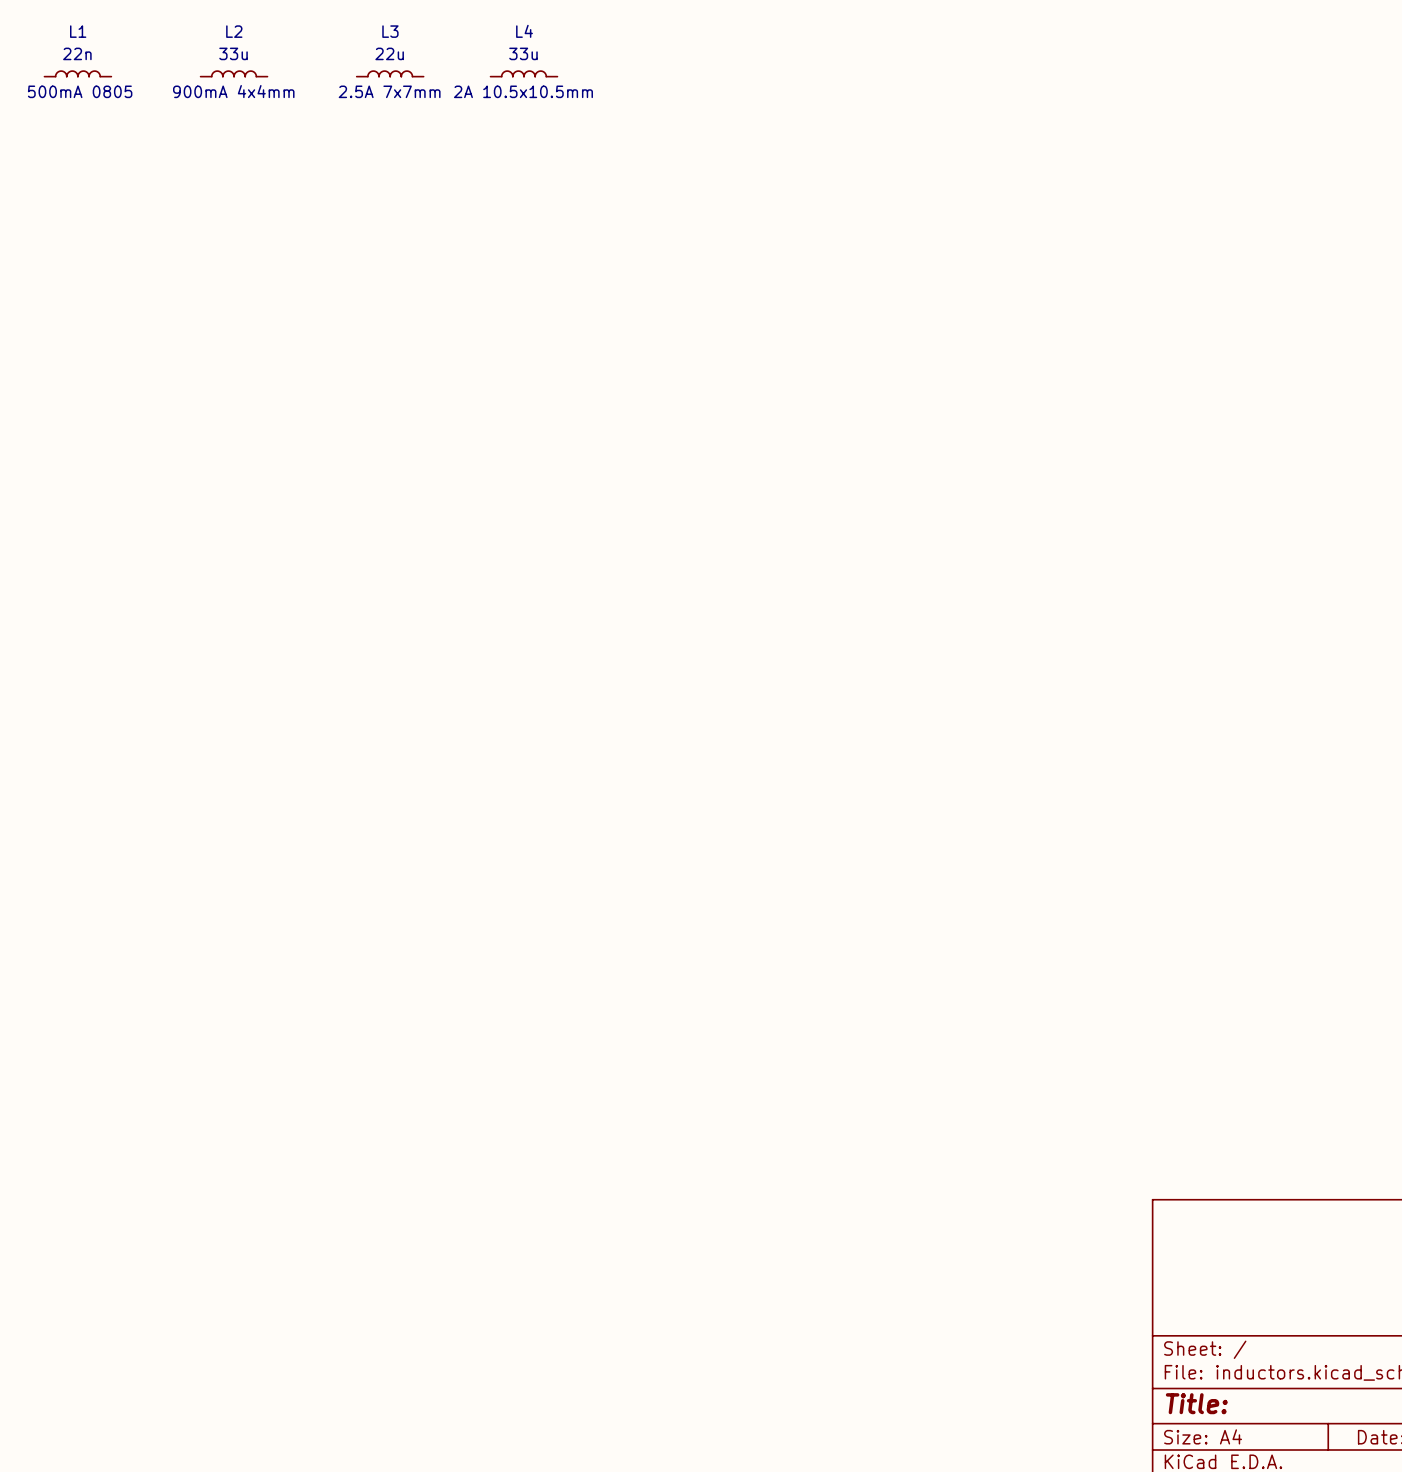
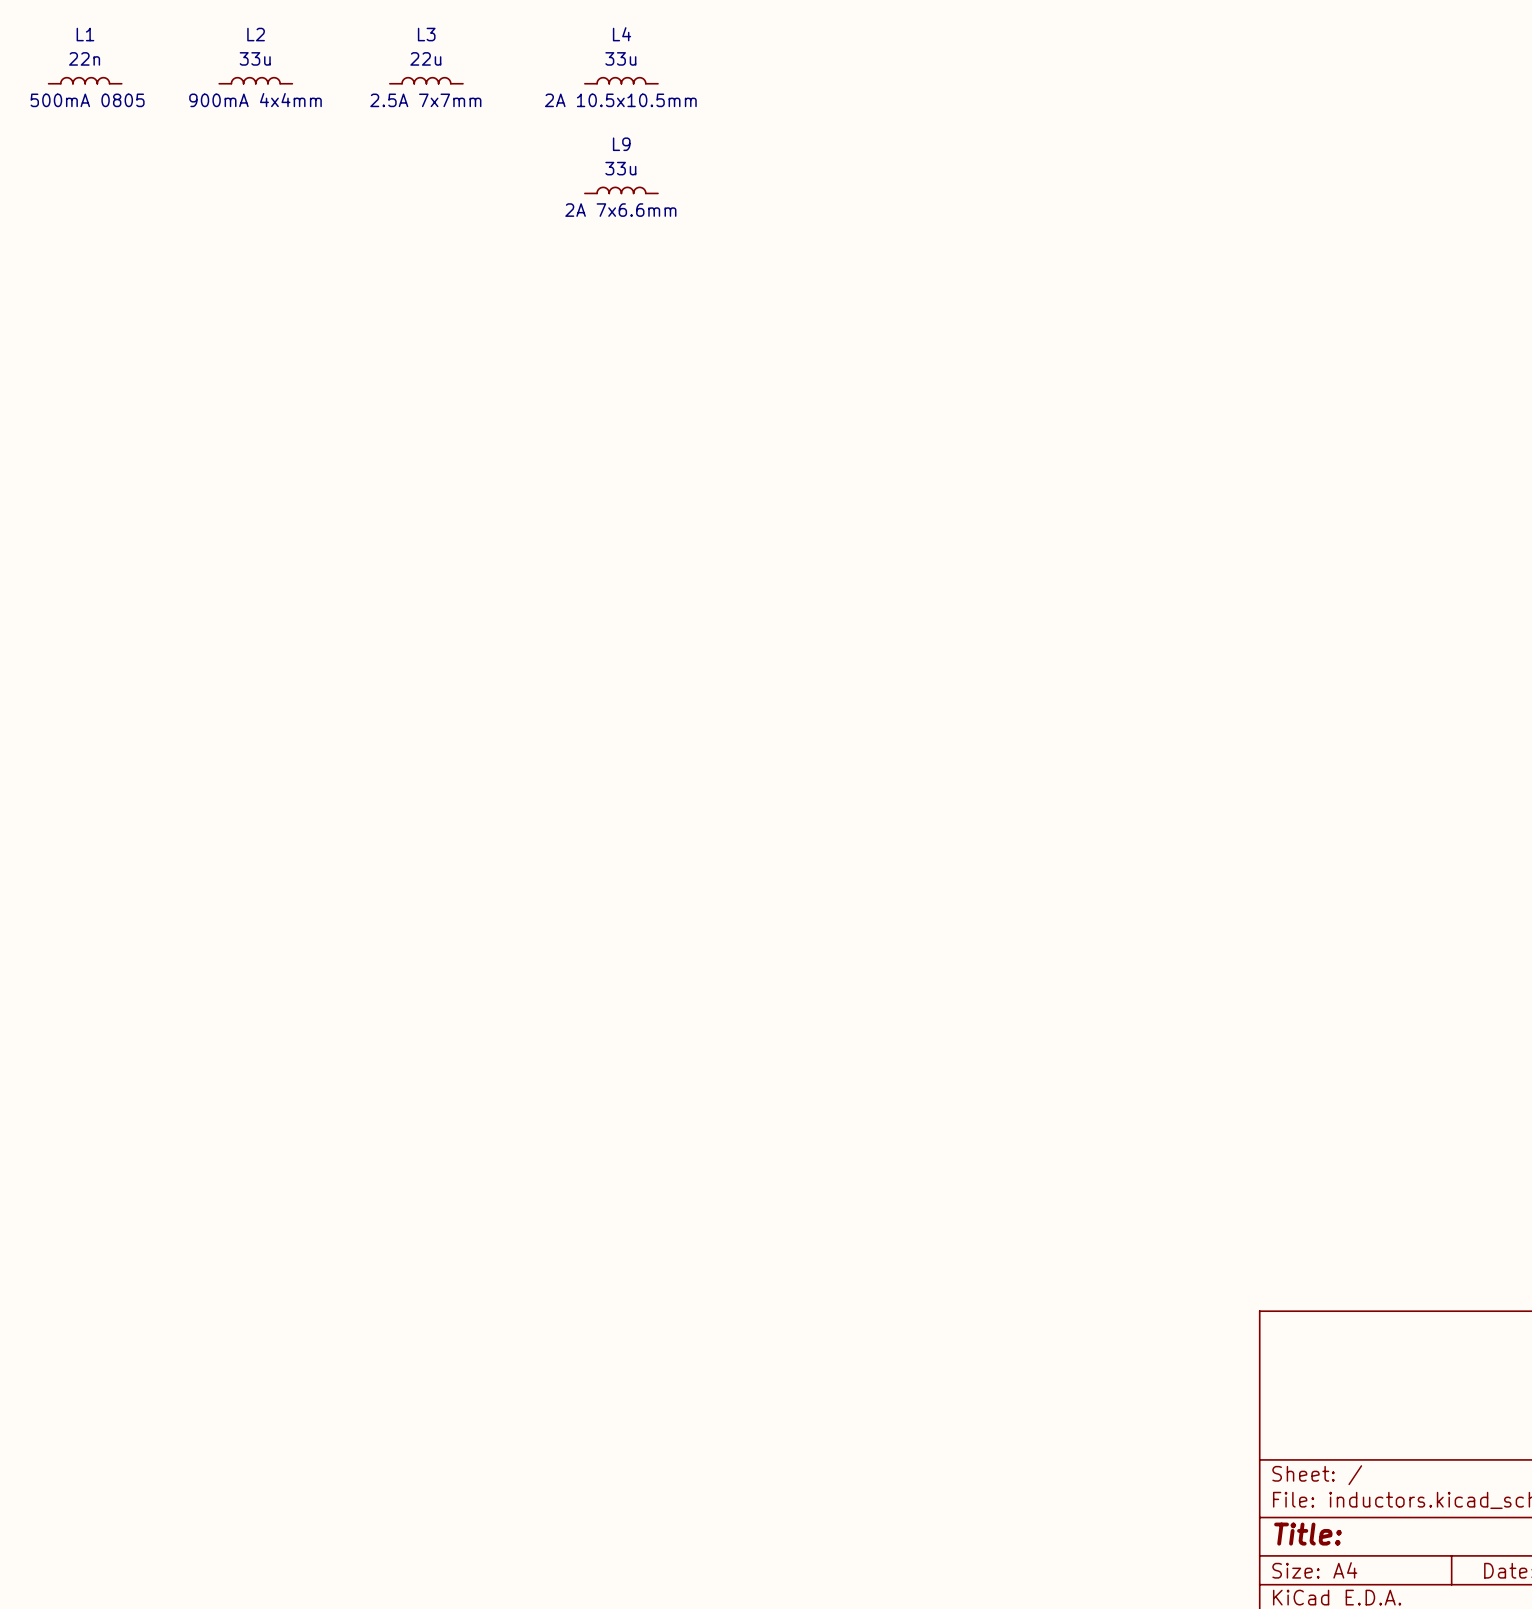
L4 position: (523, 73) -> (621, 80)
L9: none -> 33u (621, 190)

